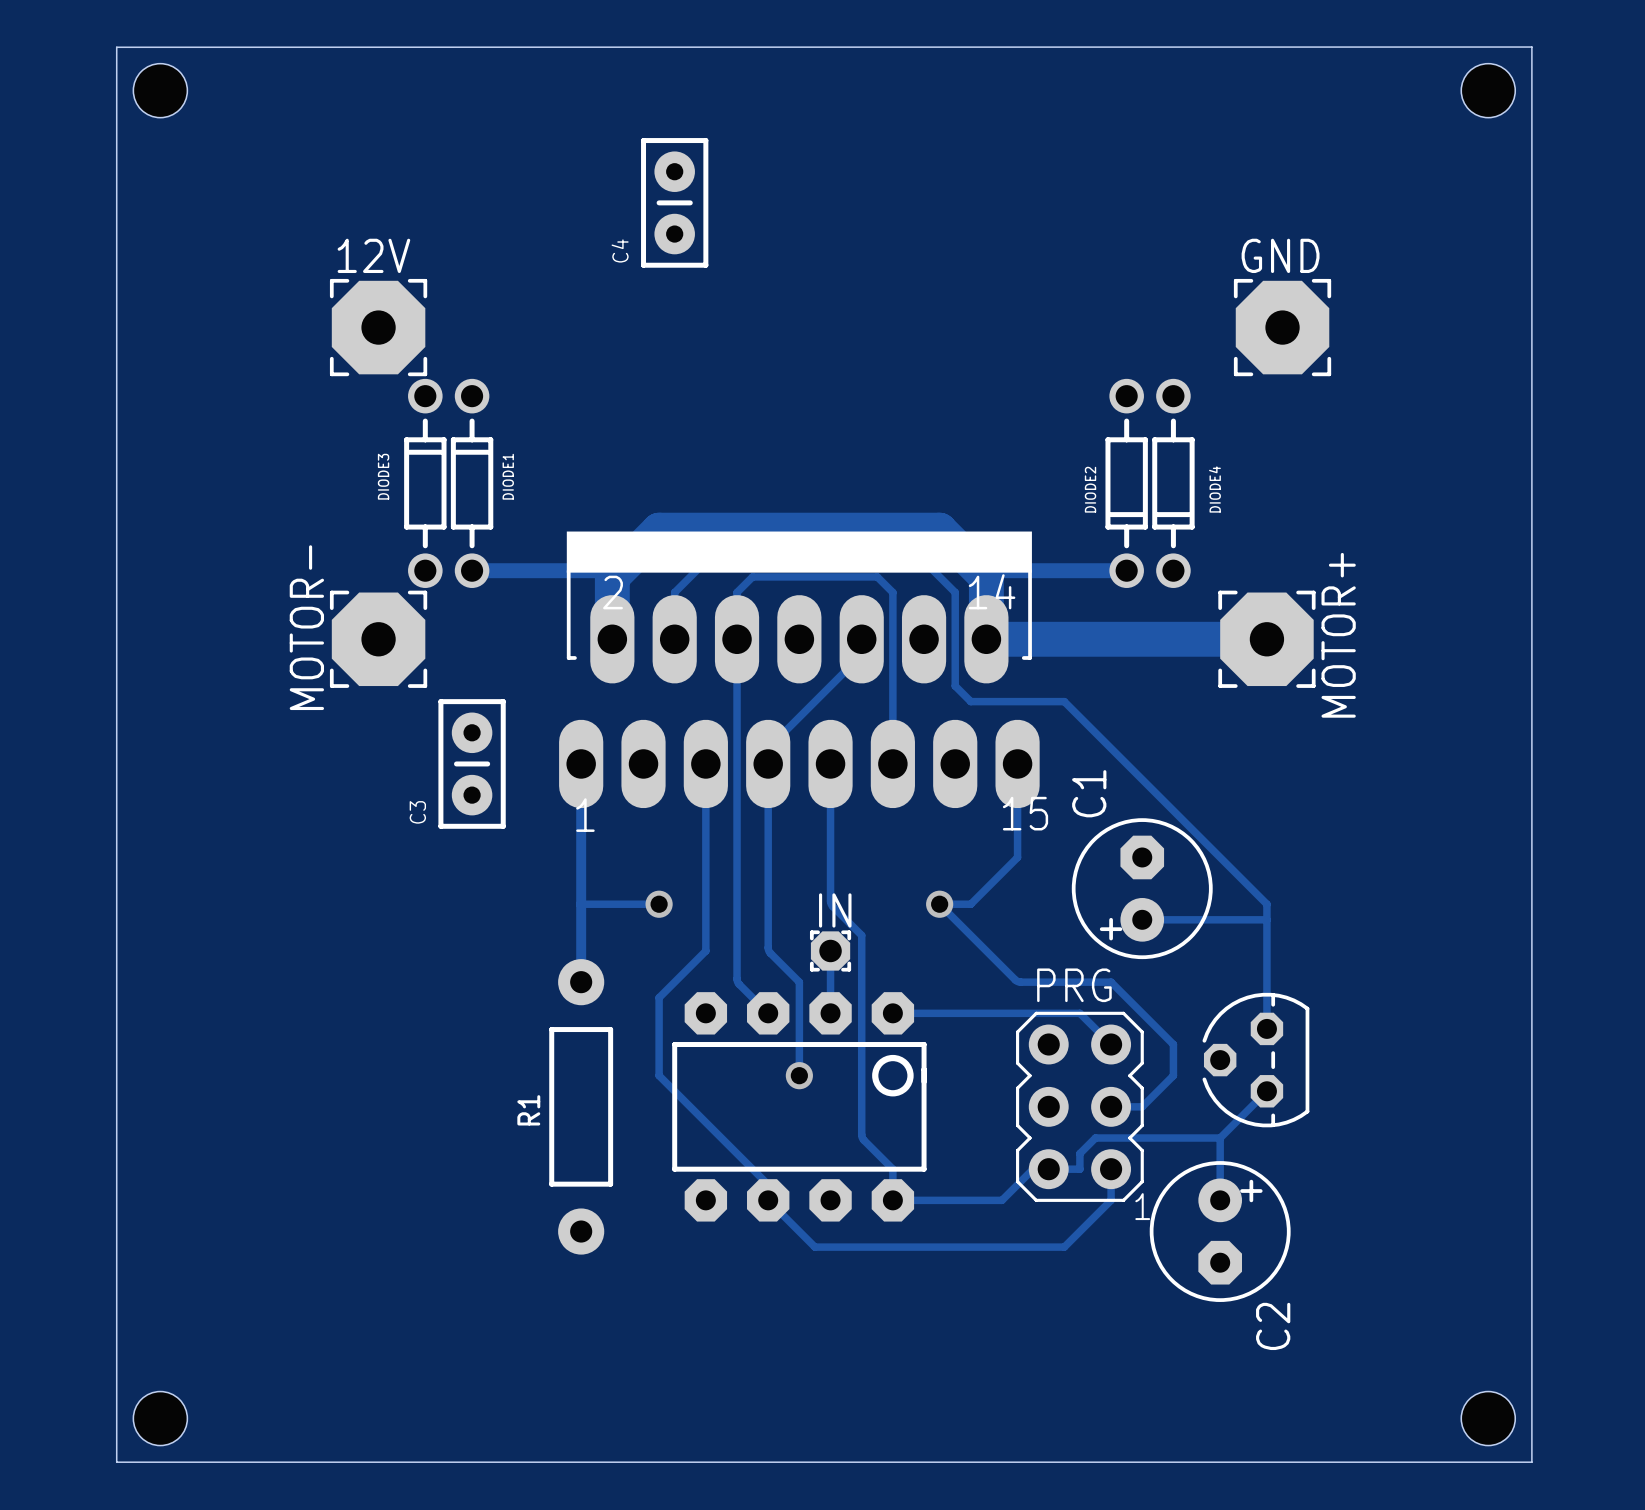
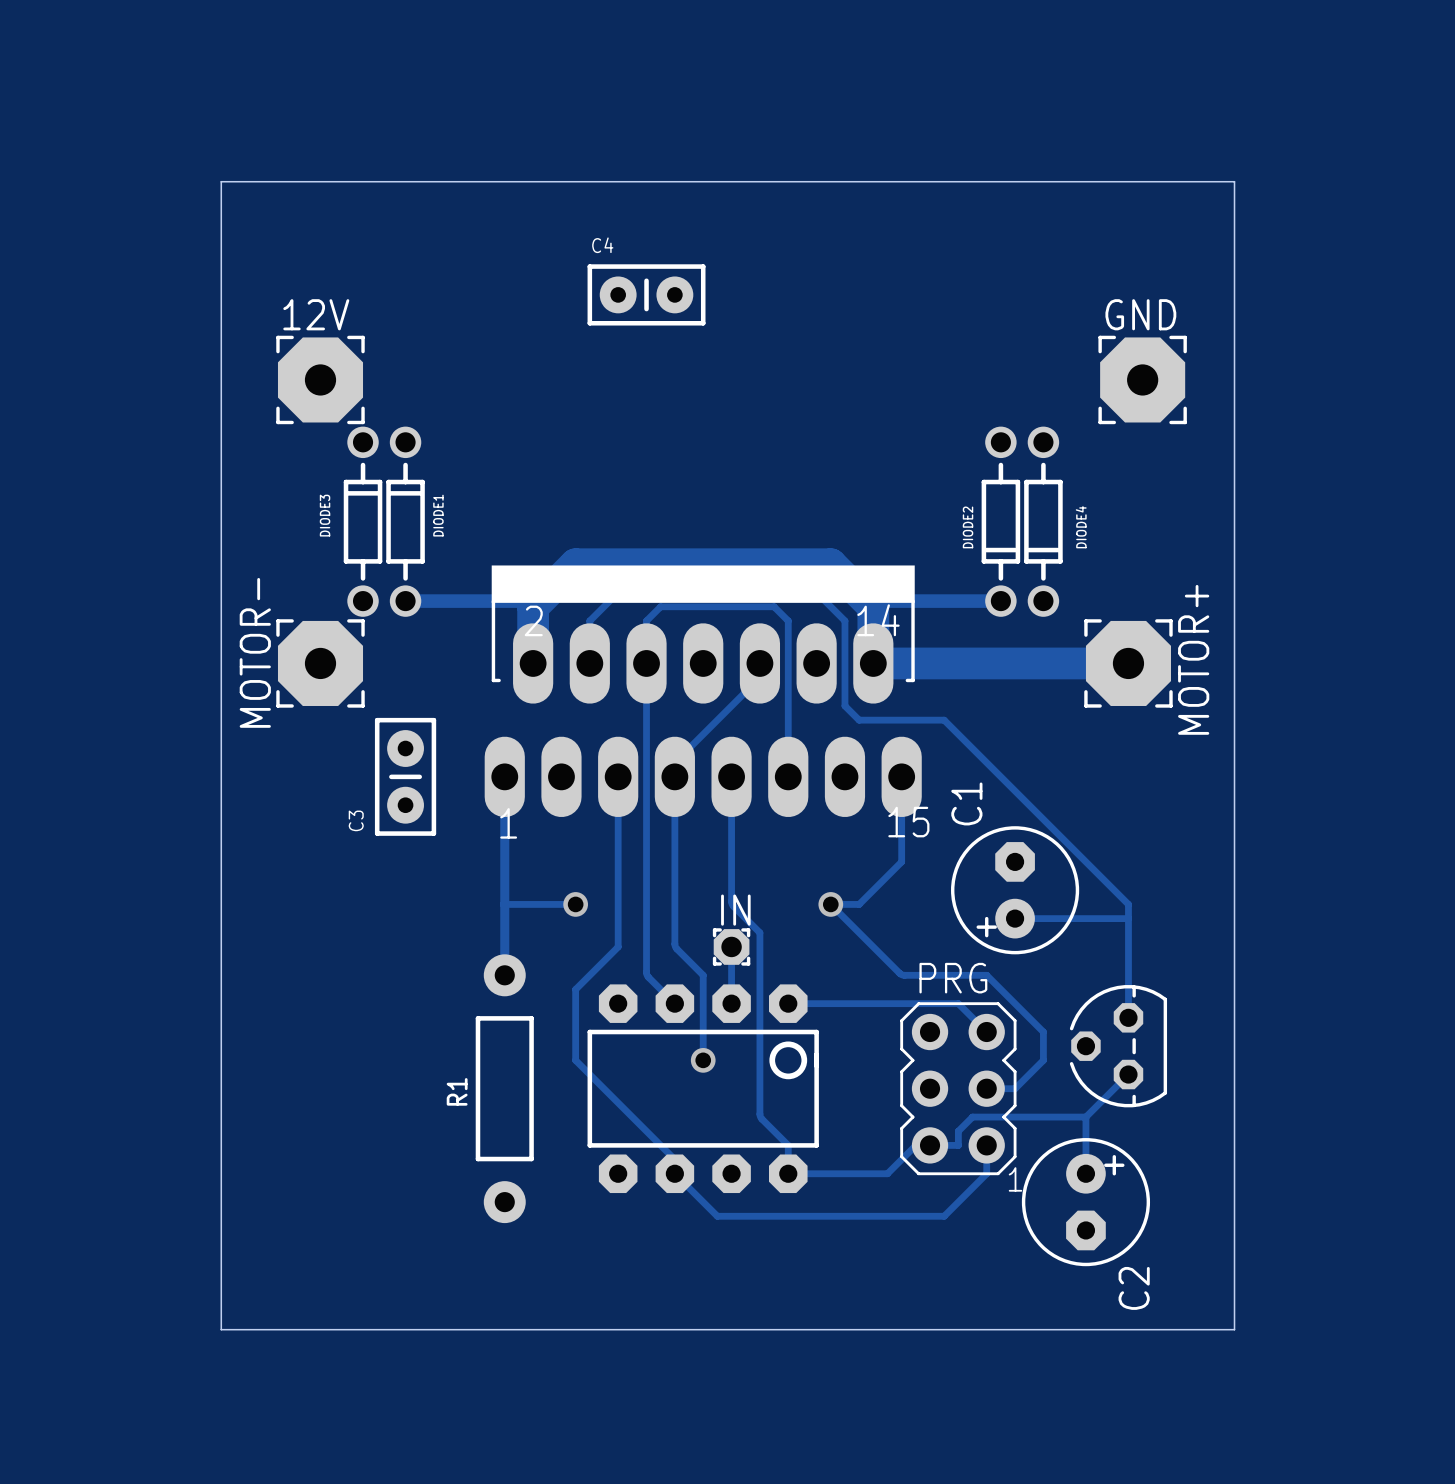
board edge: (1531, 47) (1531, 1462) (116, 1462) (116, 47) (1531, 47) -> (221, 181) (221, 1329) (1234, 1329) (1234, 181) (221, 181)
hole: (160, 90) -> none
hole: (1488, 90) -> none
C4 rotation: 0° (674, 202) -> 90° clockwise (646, 294)
hole: (160, 1418) -> none
hole: (1488, 1418) -> none

